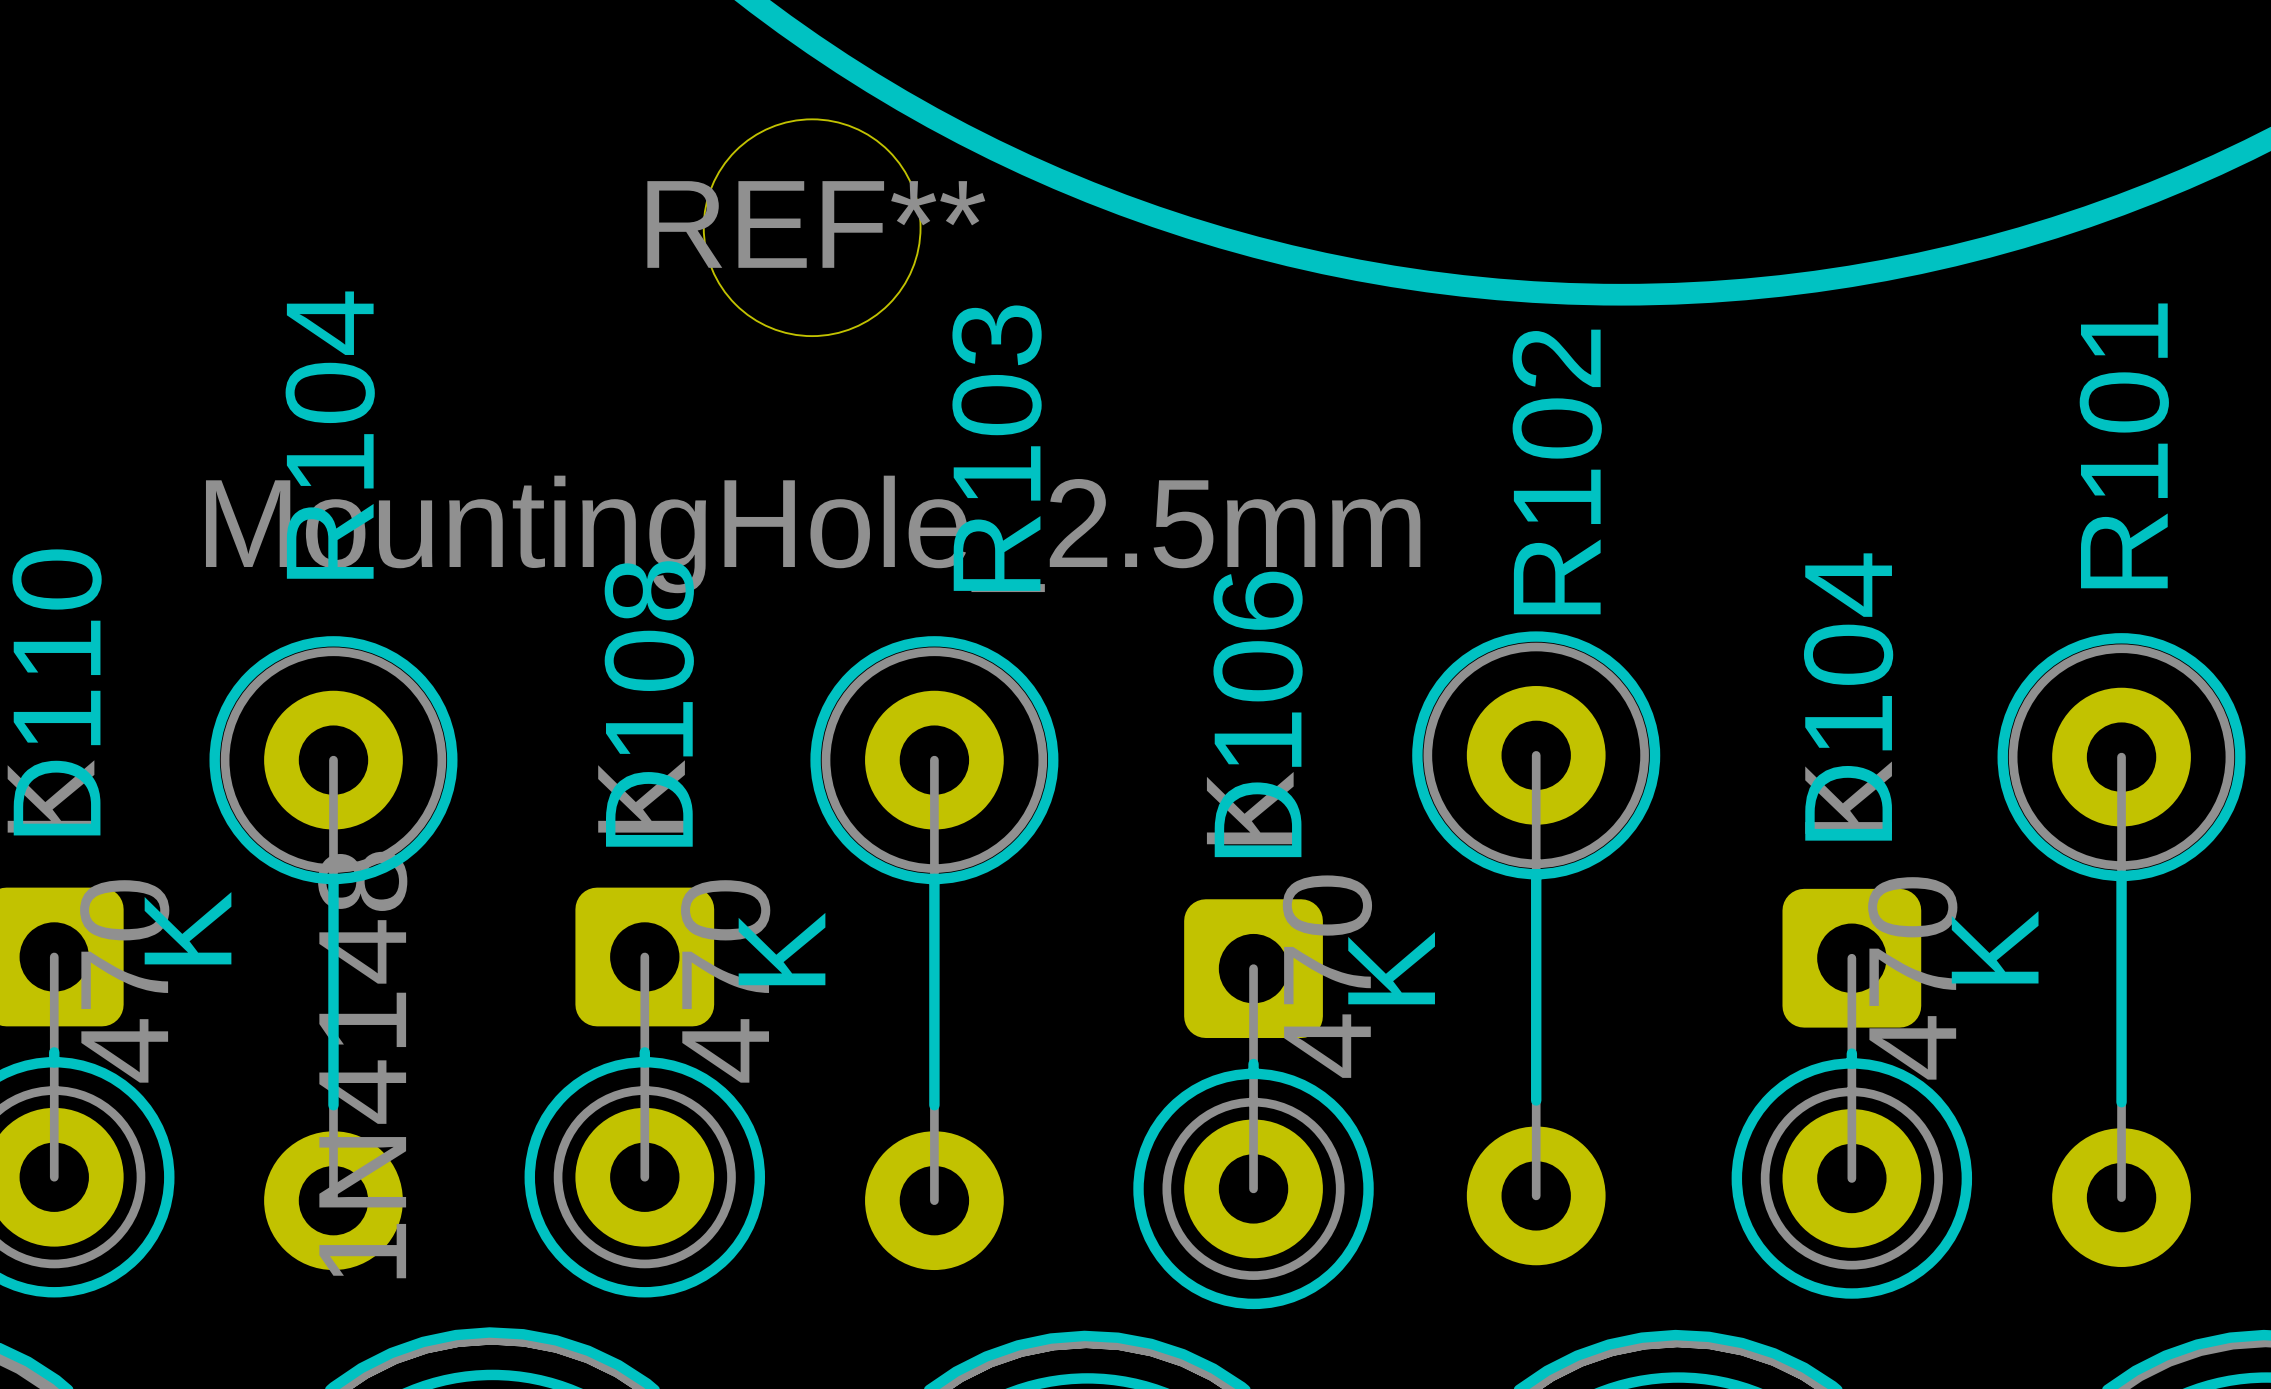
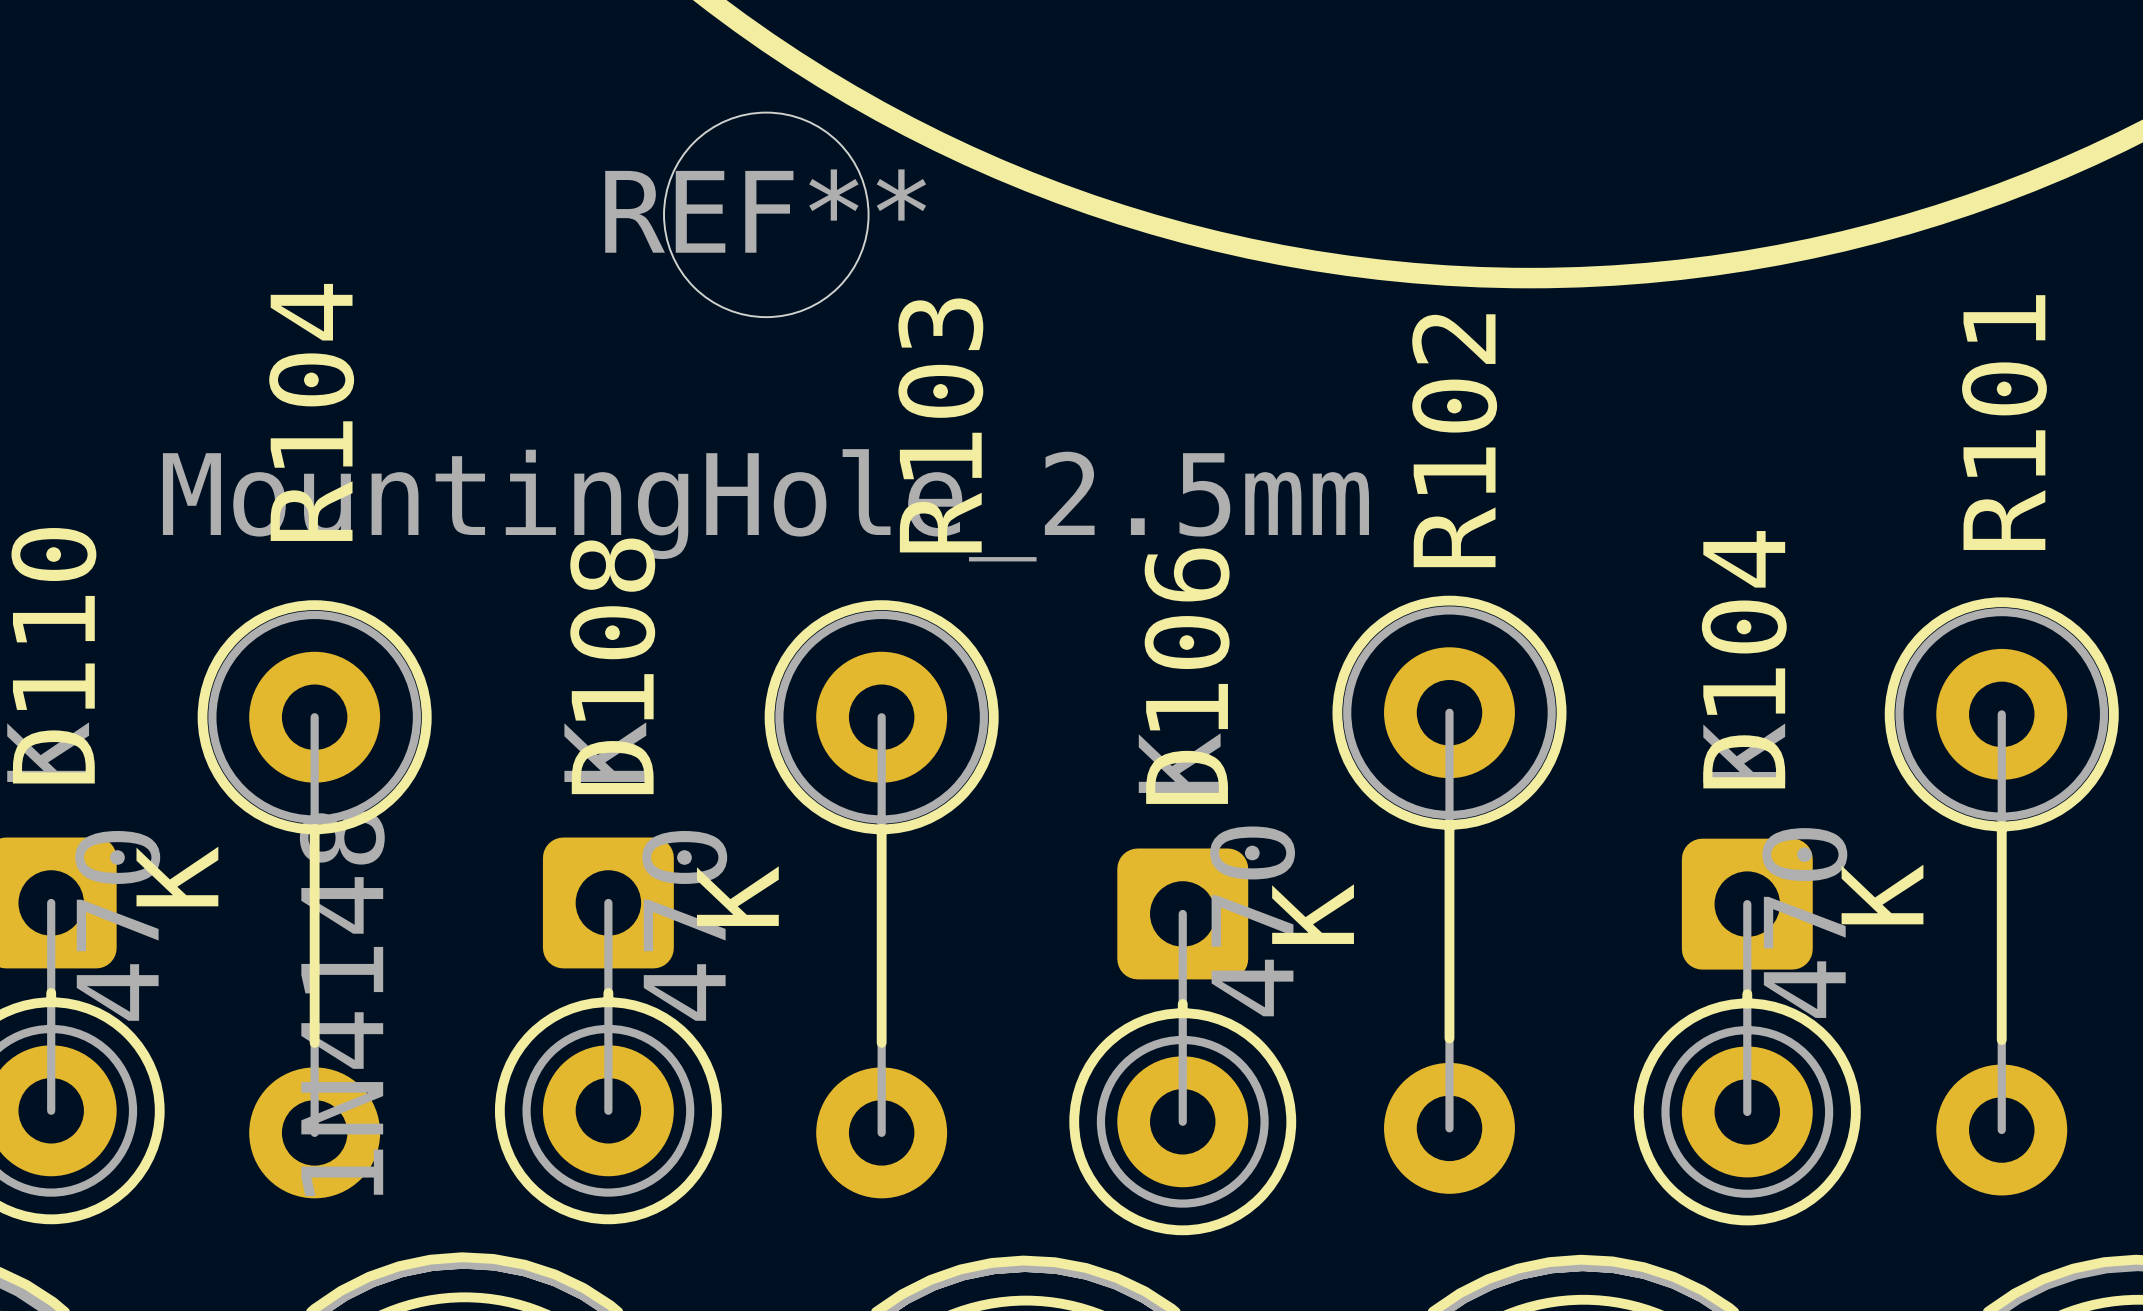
R102 name position: R102 (1557, 471) -> R102 (1454, 440)

